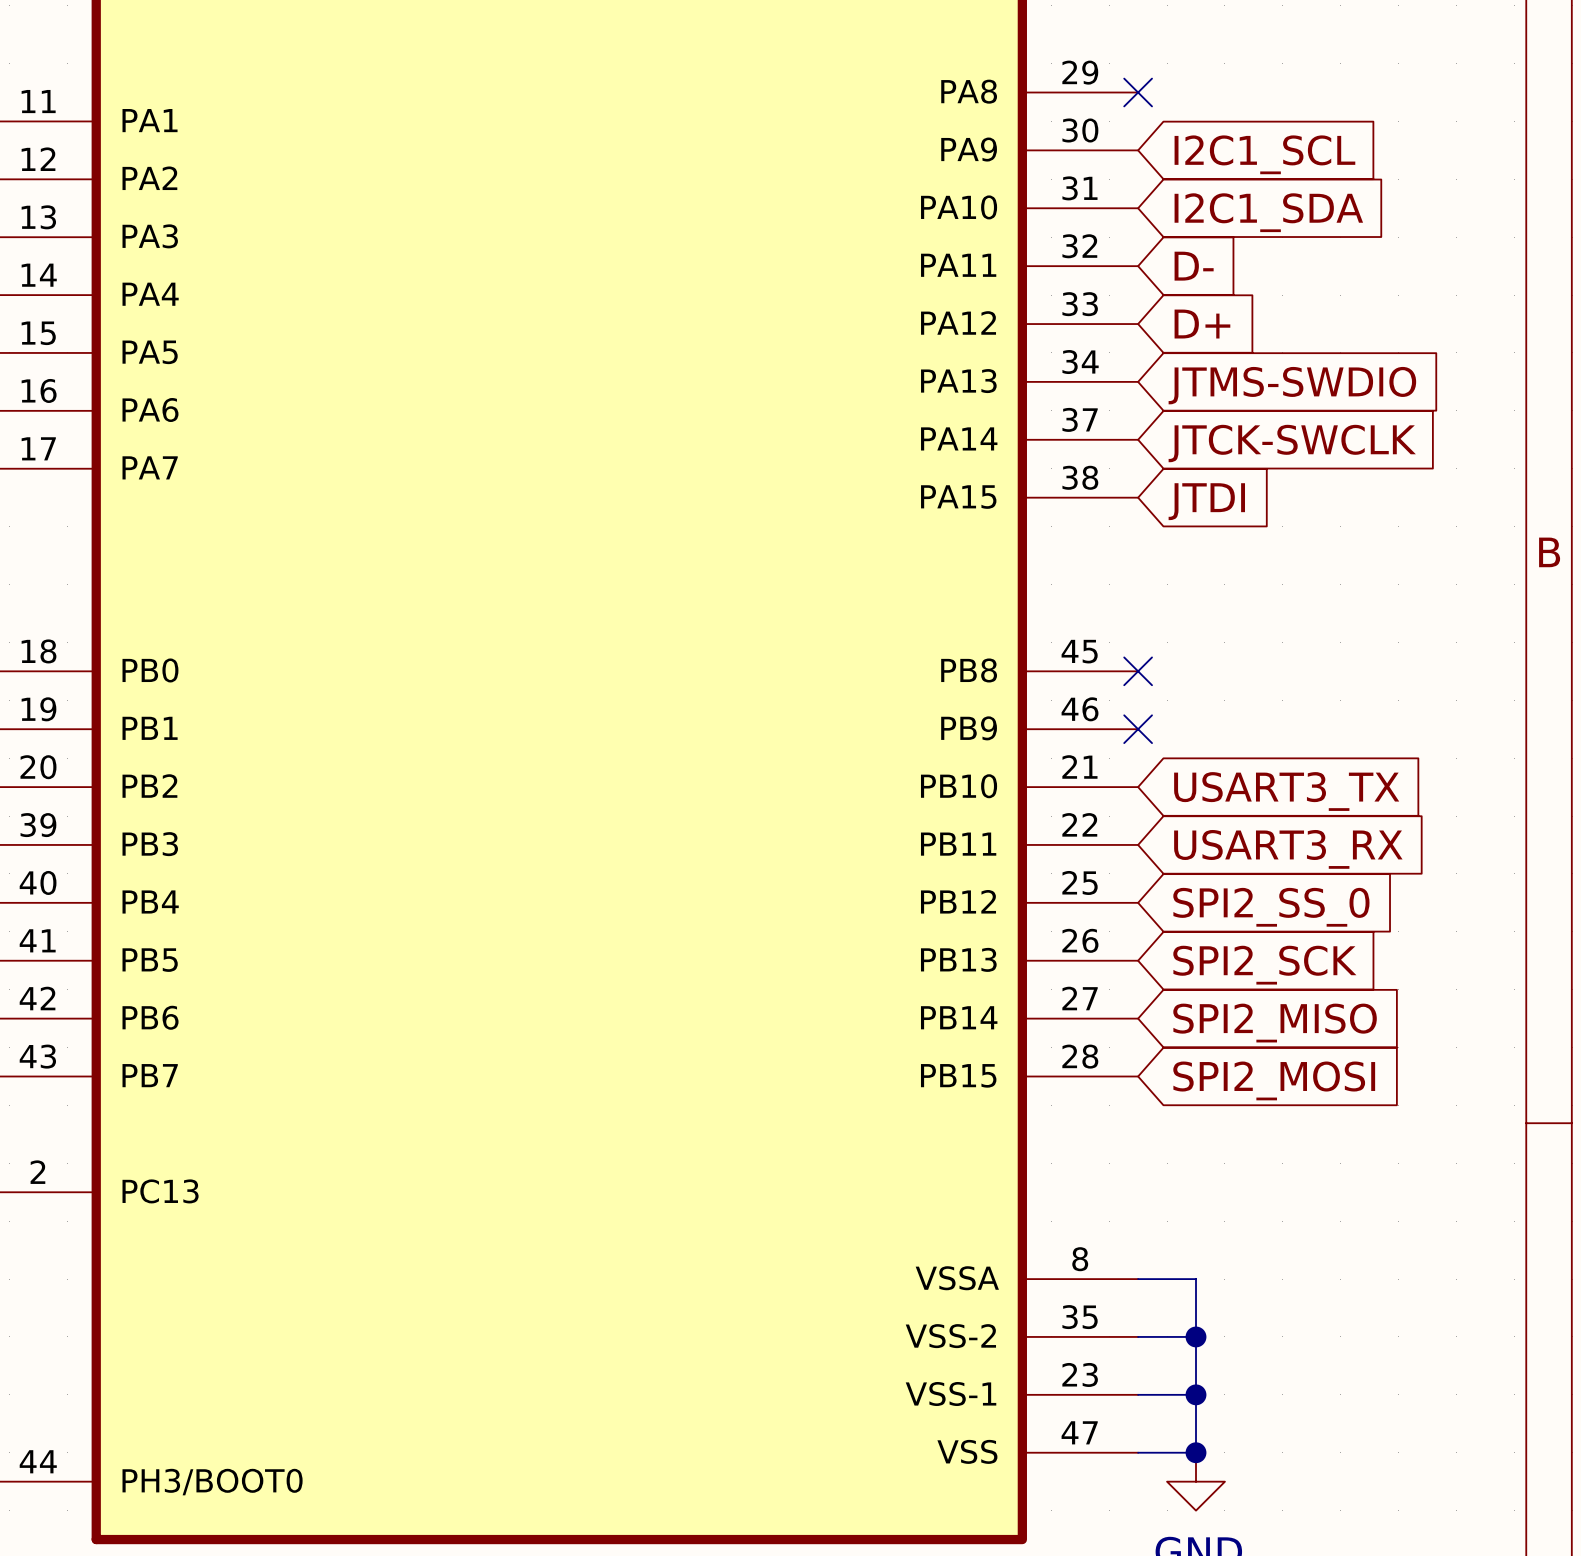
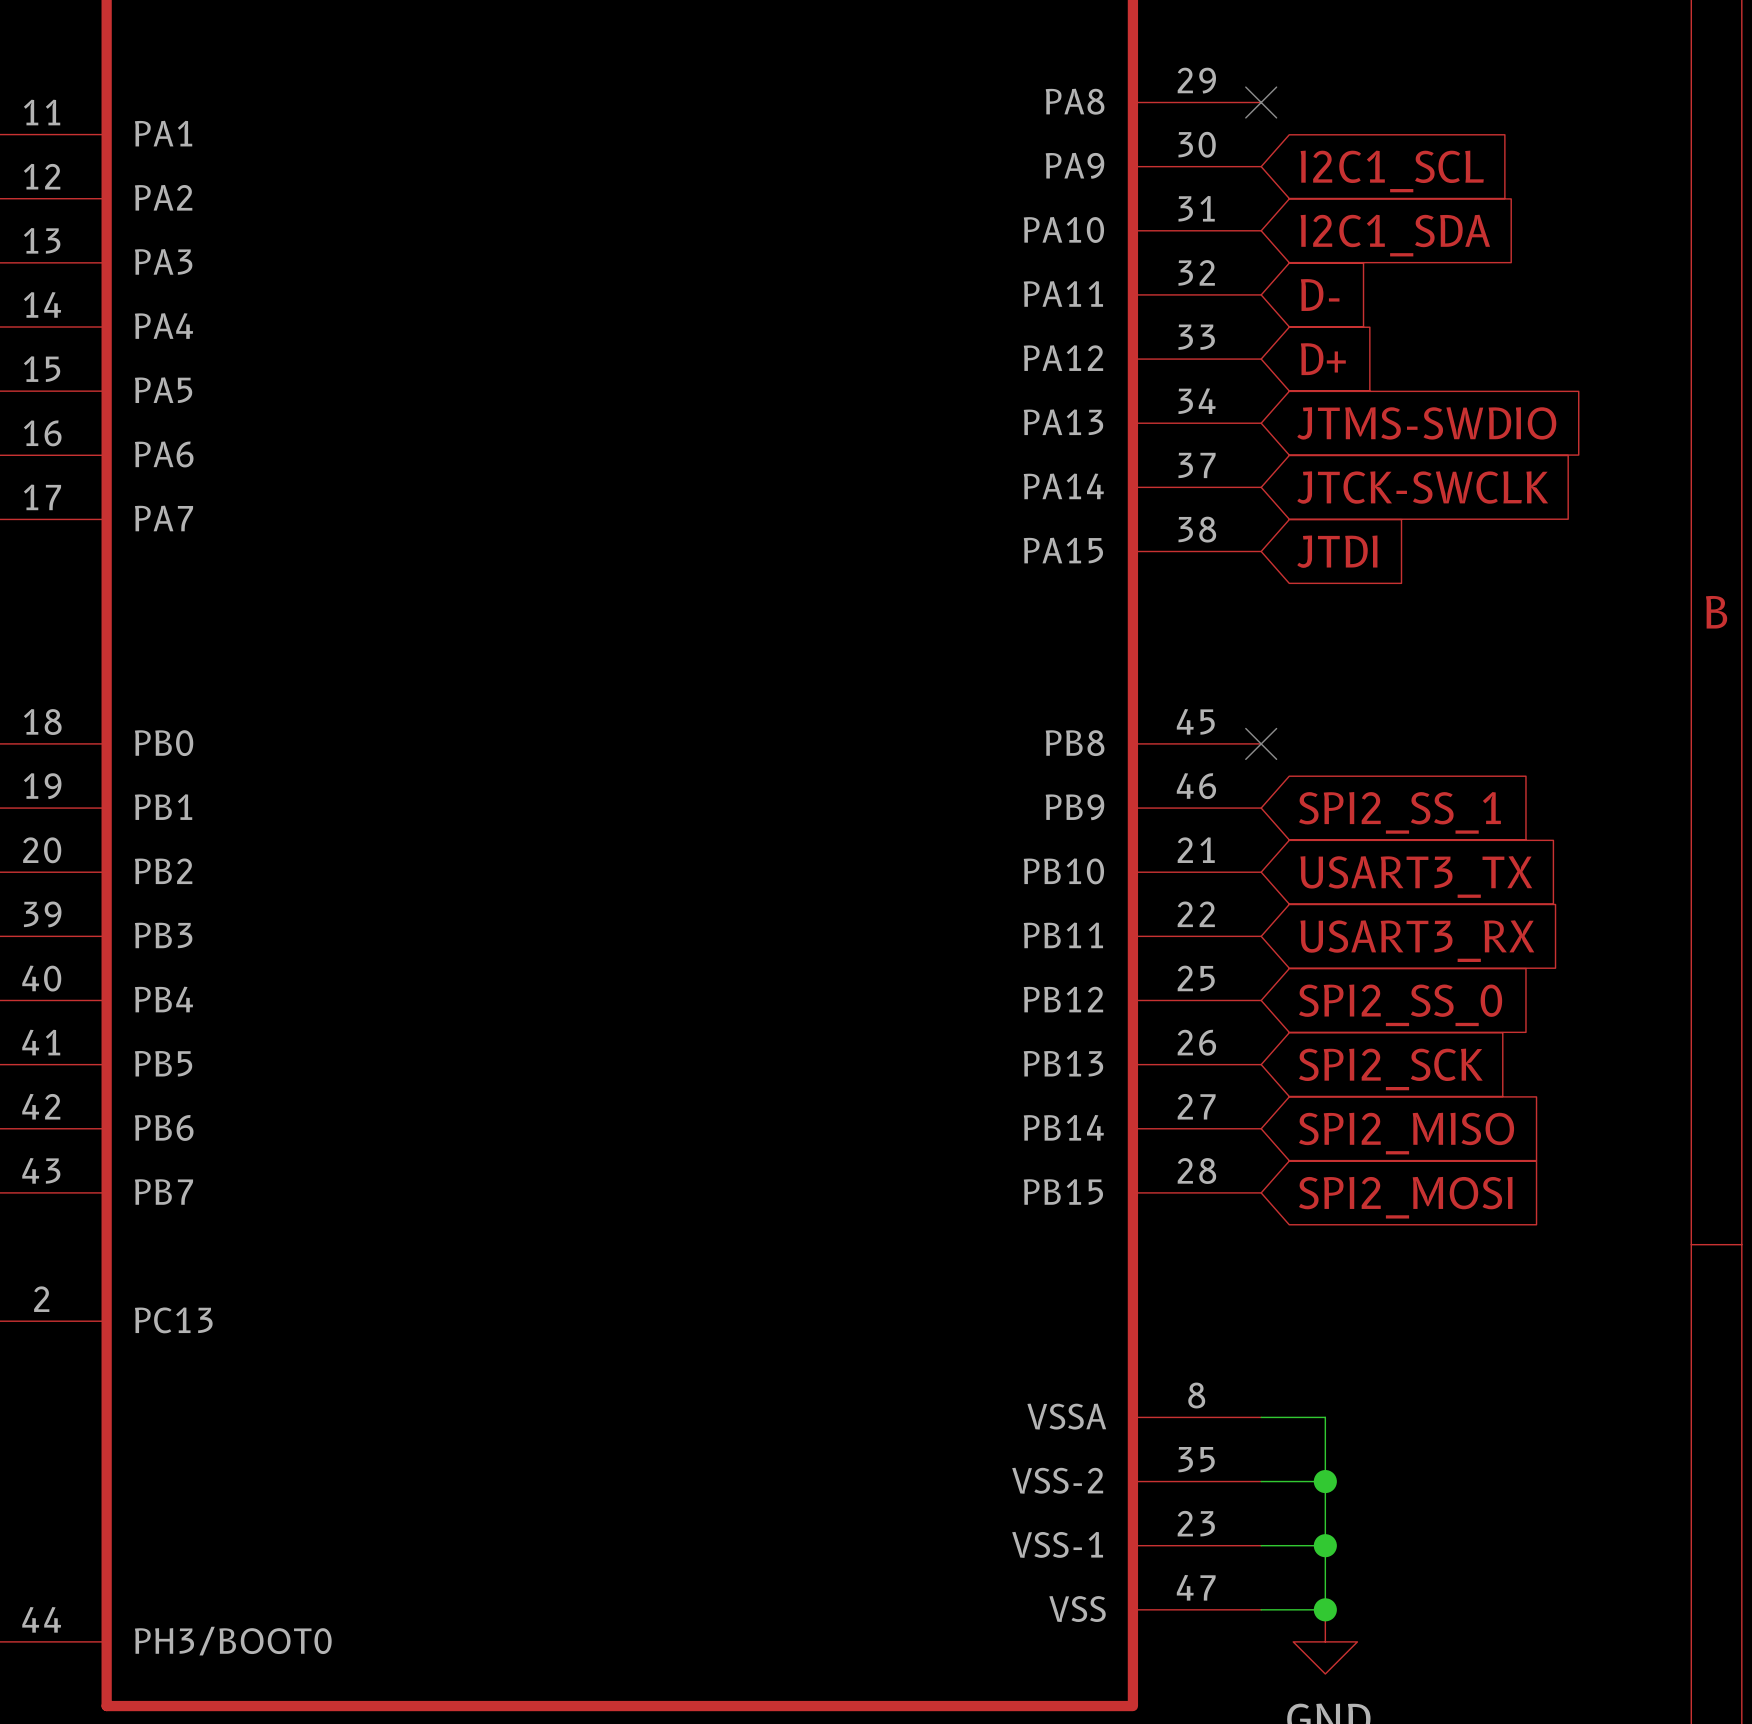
no-connect mark: (1138, 729) -> none
global label: none -> SPI2_SS_1 (1399, 812)

